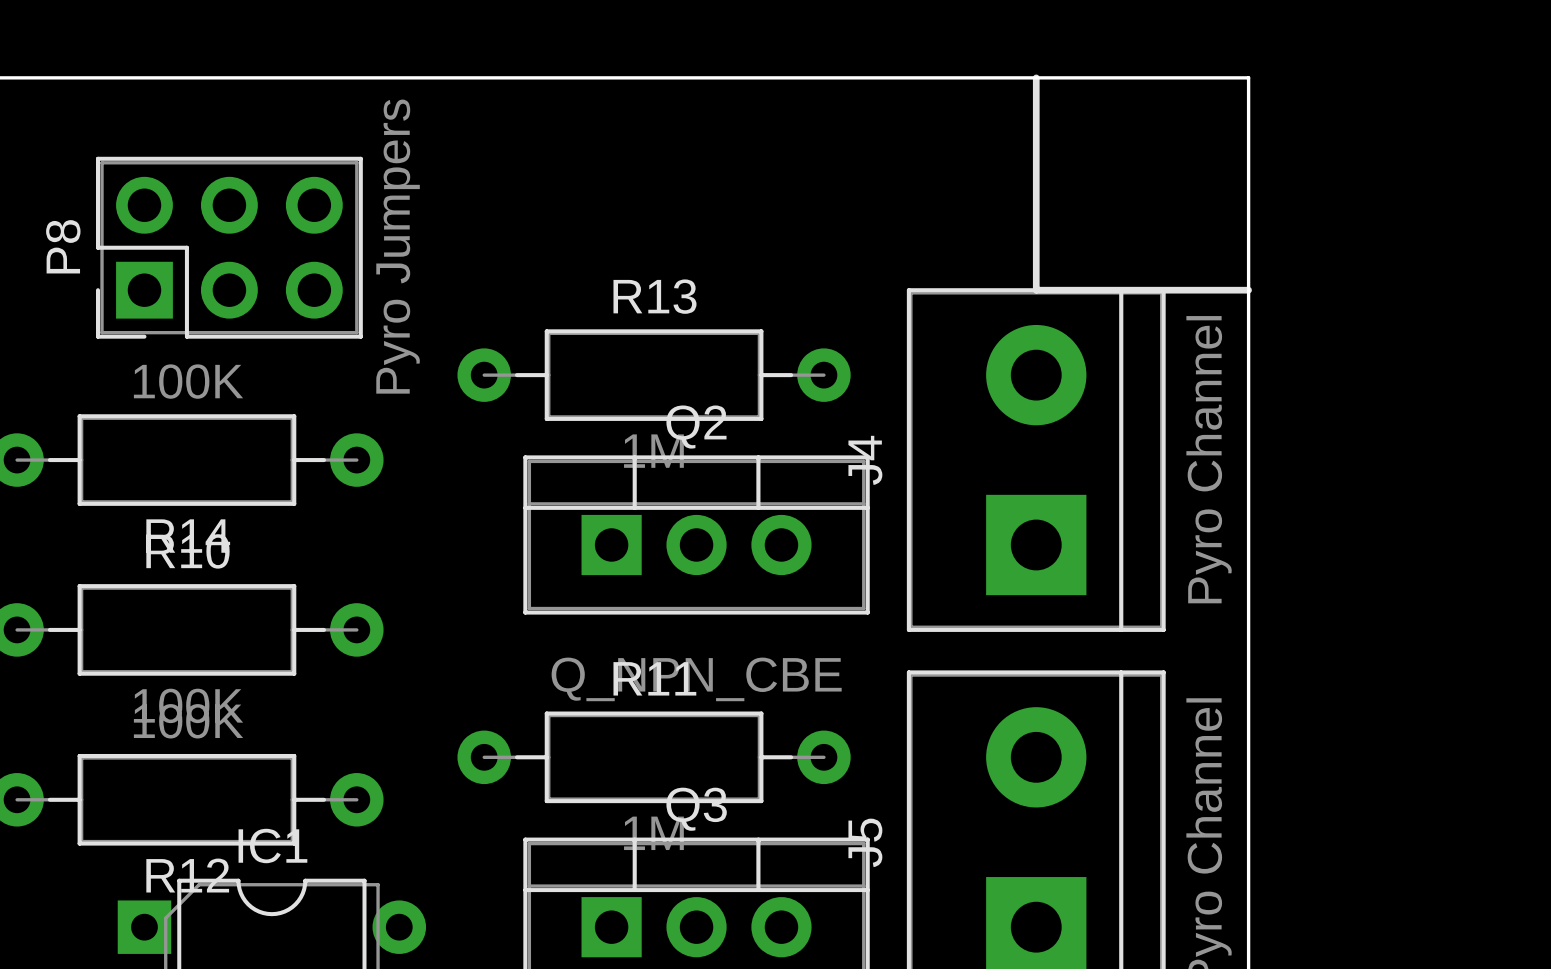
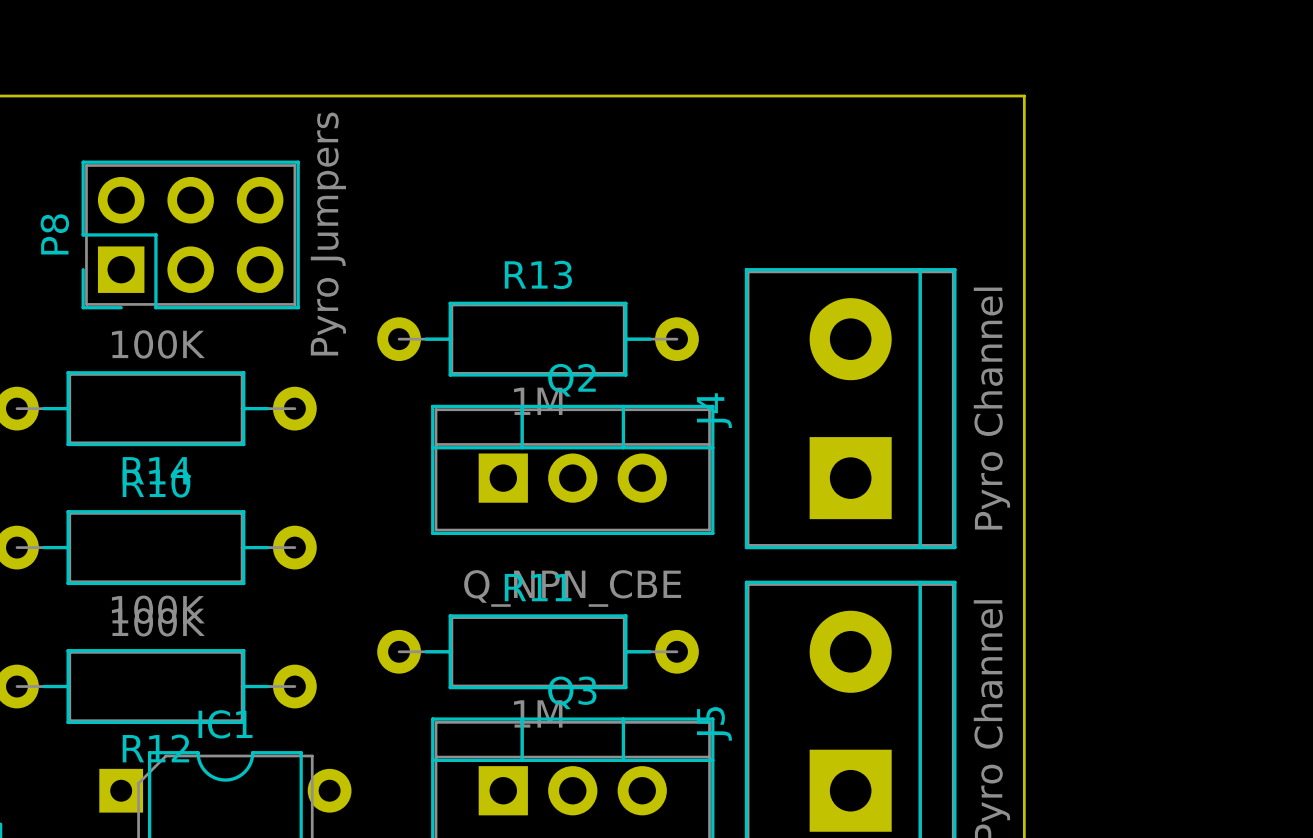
line: (1036, 77) (1036, 290) (1248, 290) -> none

